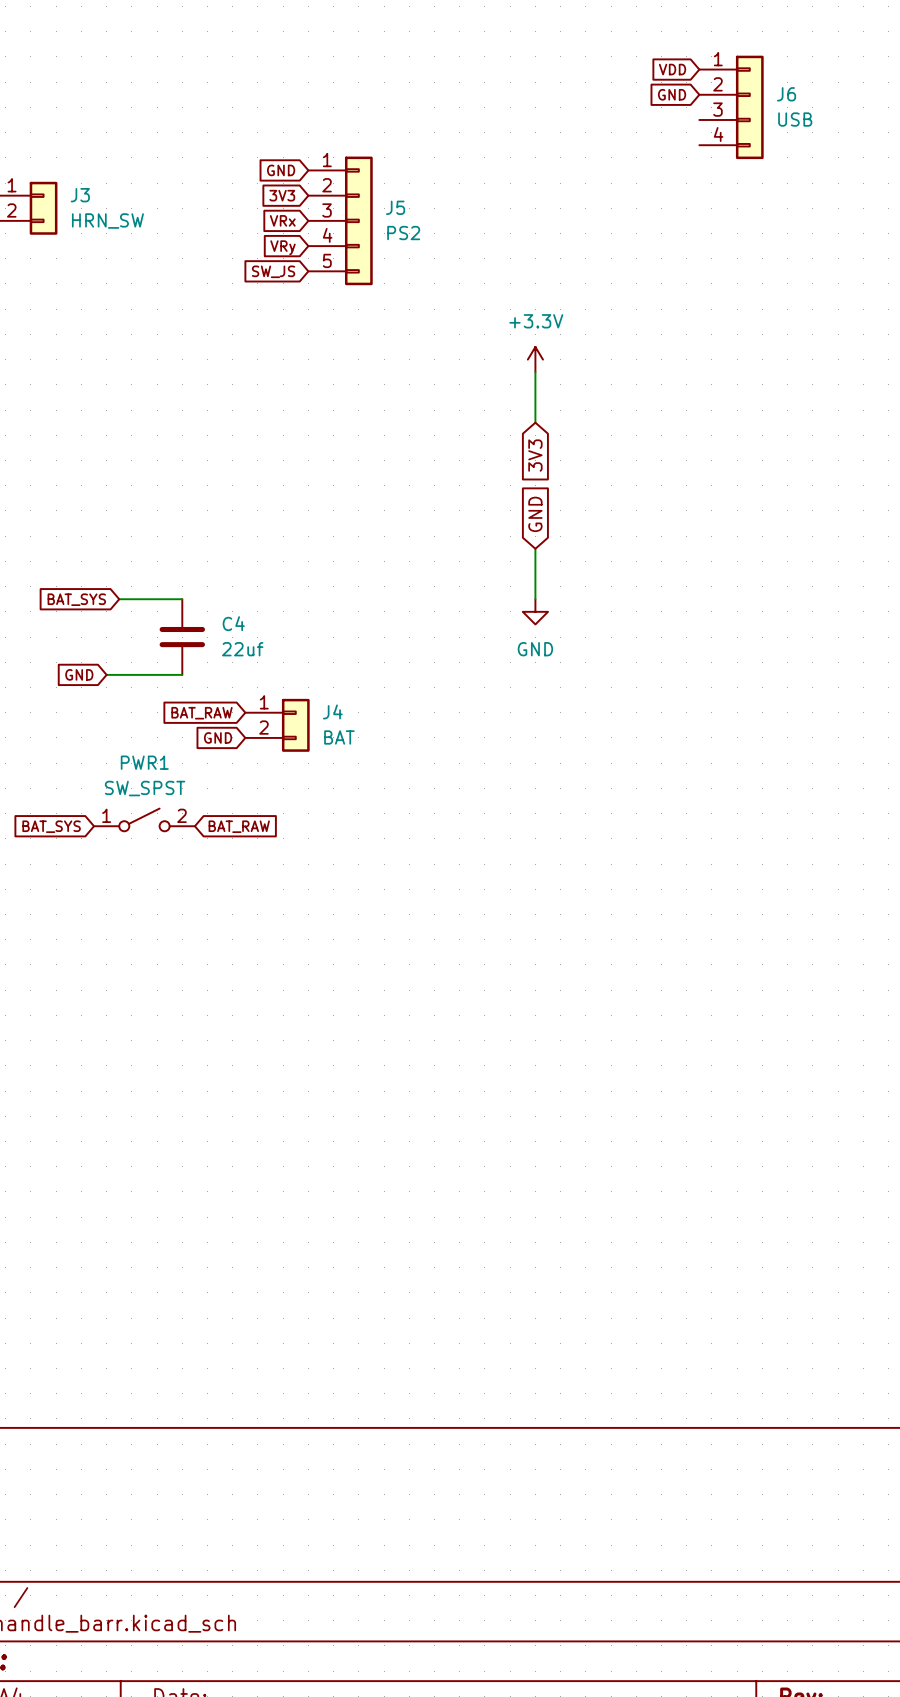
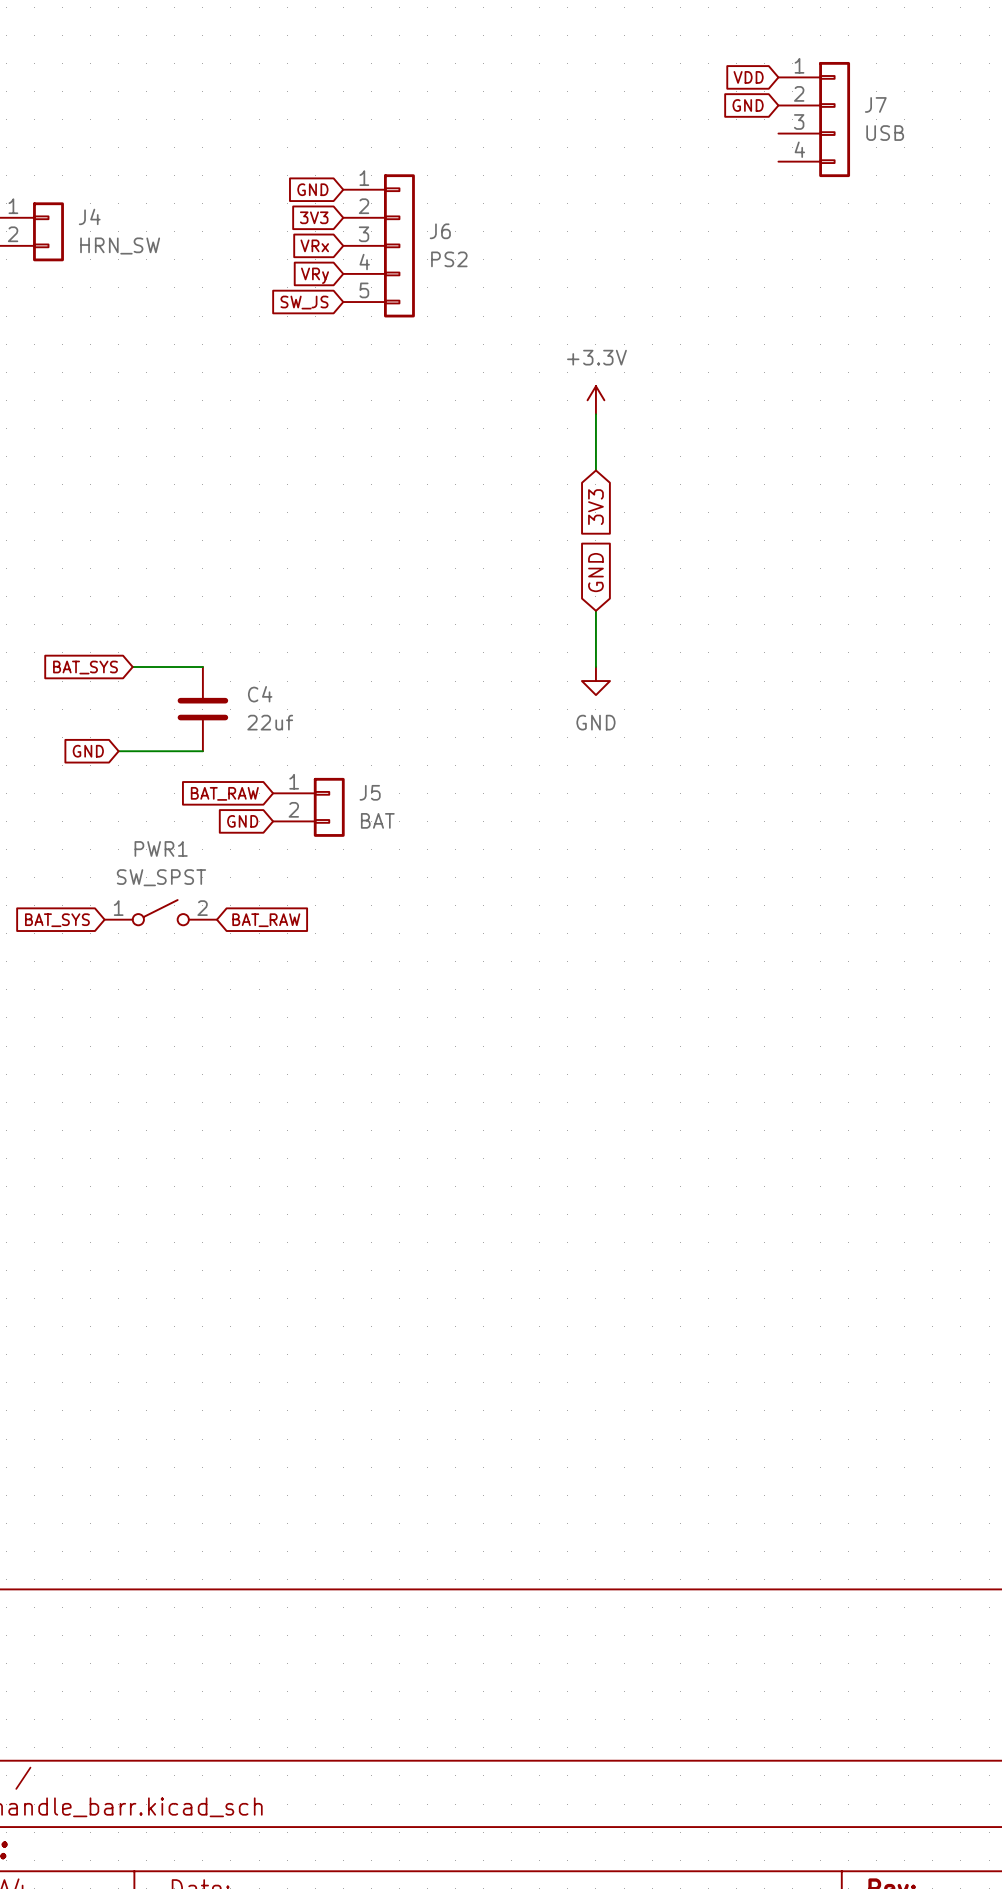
J6 name: J6 (786, 94) -> J7 (875, 104)
J3 name: J3 (80, 195) -> J4 (89, 216)
J5 name: J5 (395, 207) -> J6 (440, 231)
J4 name: J4 (332, 711) -> J5 (370, 792)

